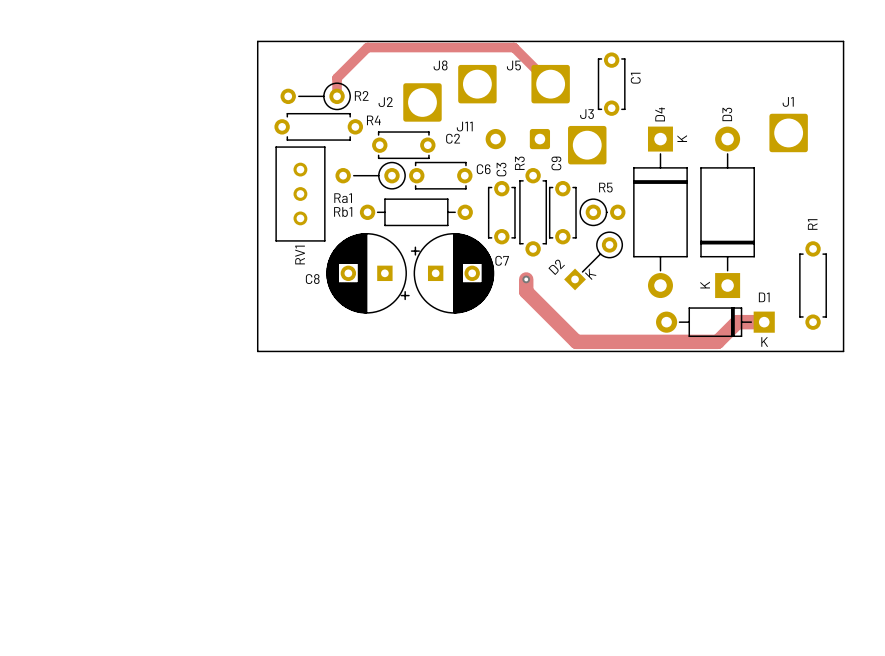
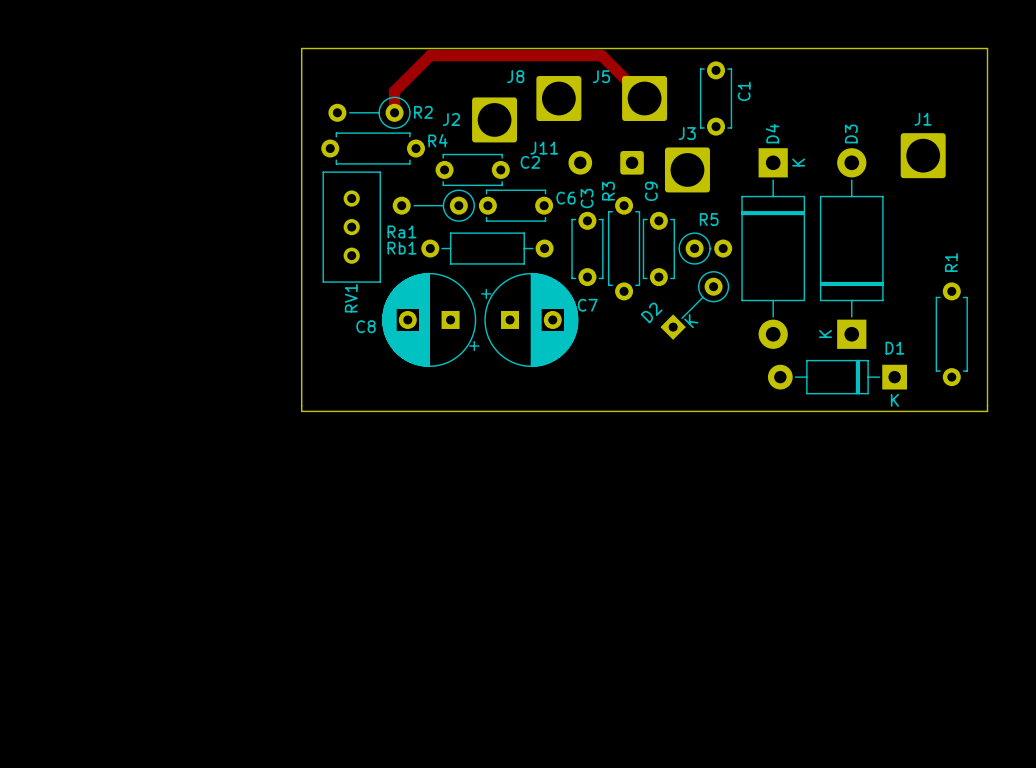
track: (526, 279) (526, 291) (576, 341) (717, 341) (737, 322) (764, 322) -> none
via: (526, 279) -> none

